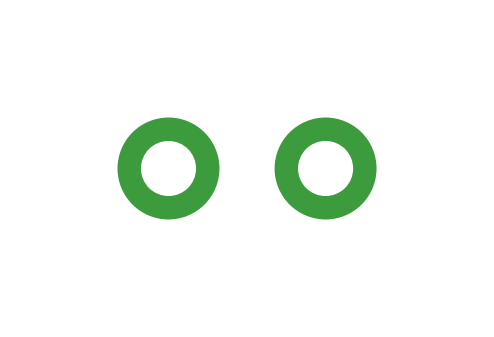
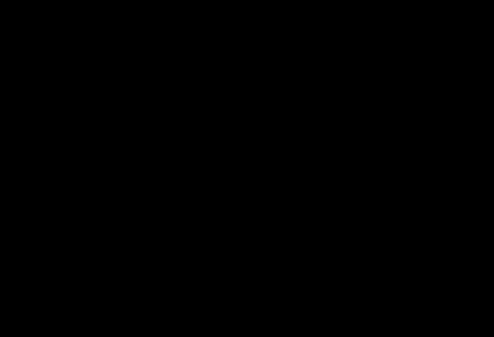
part: (247, 168) -> none

